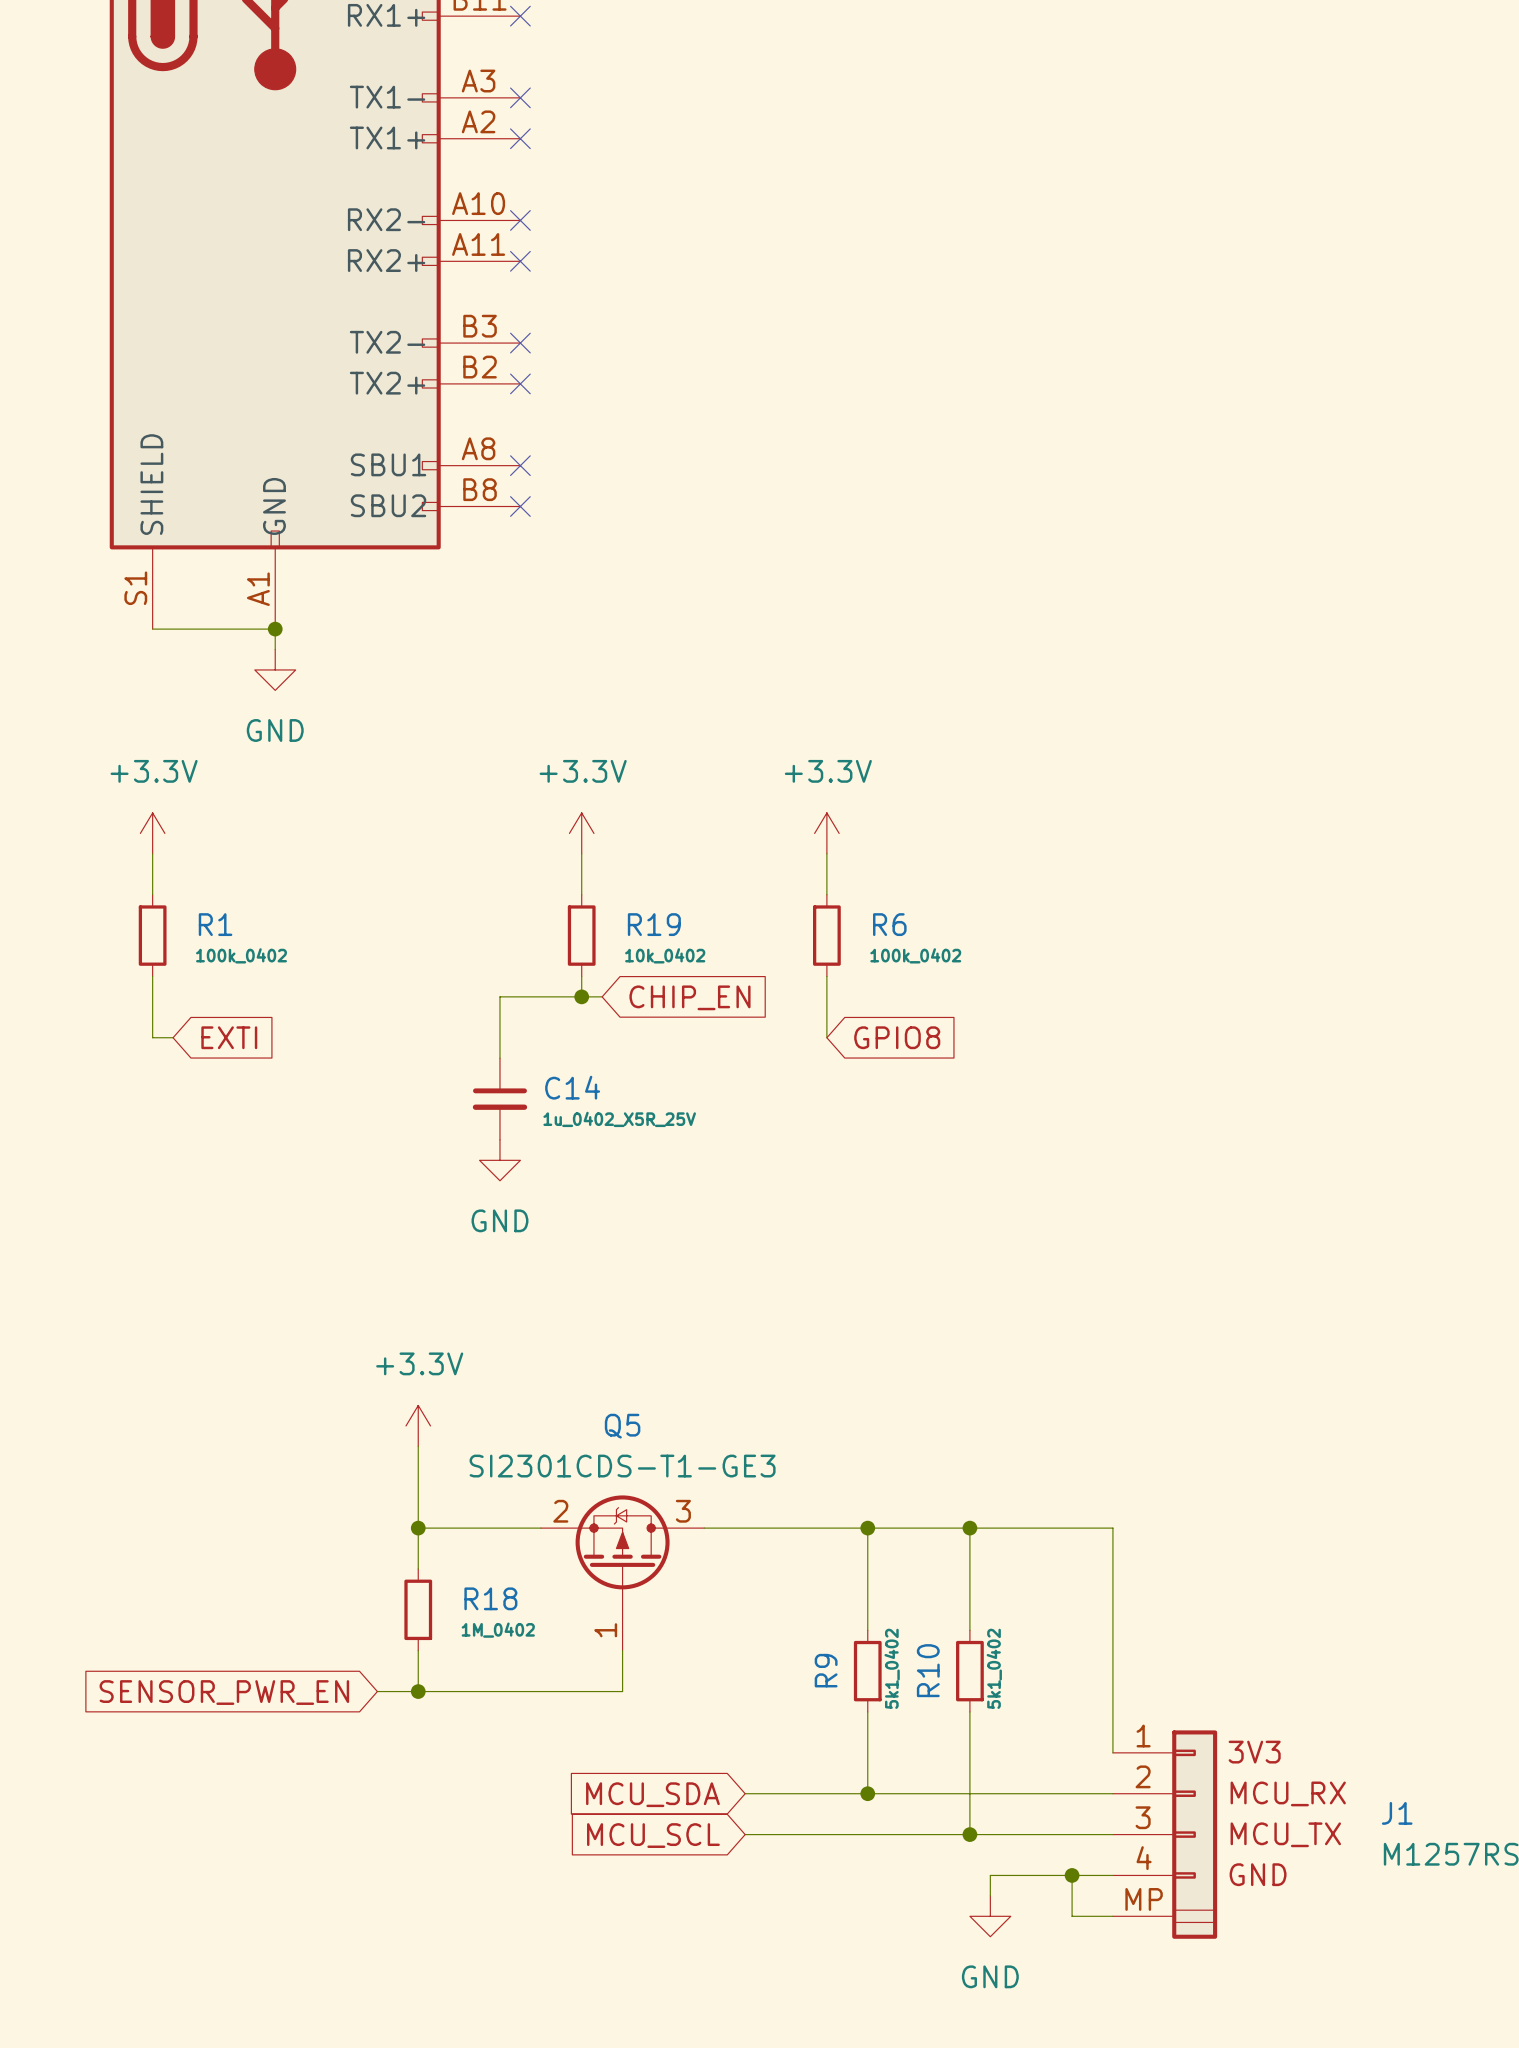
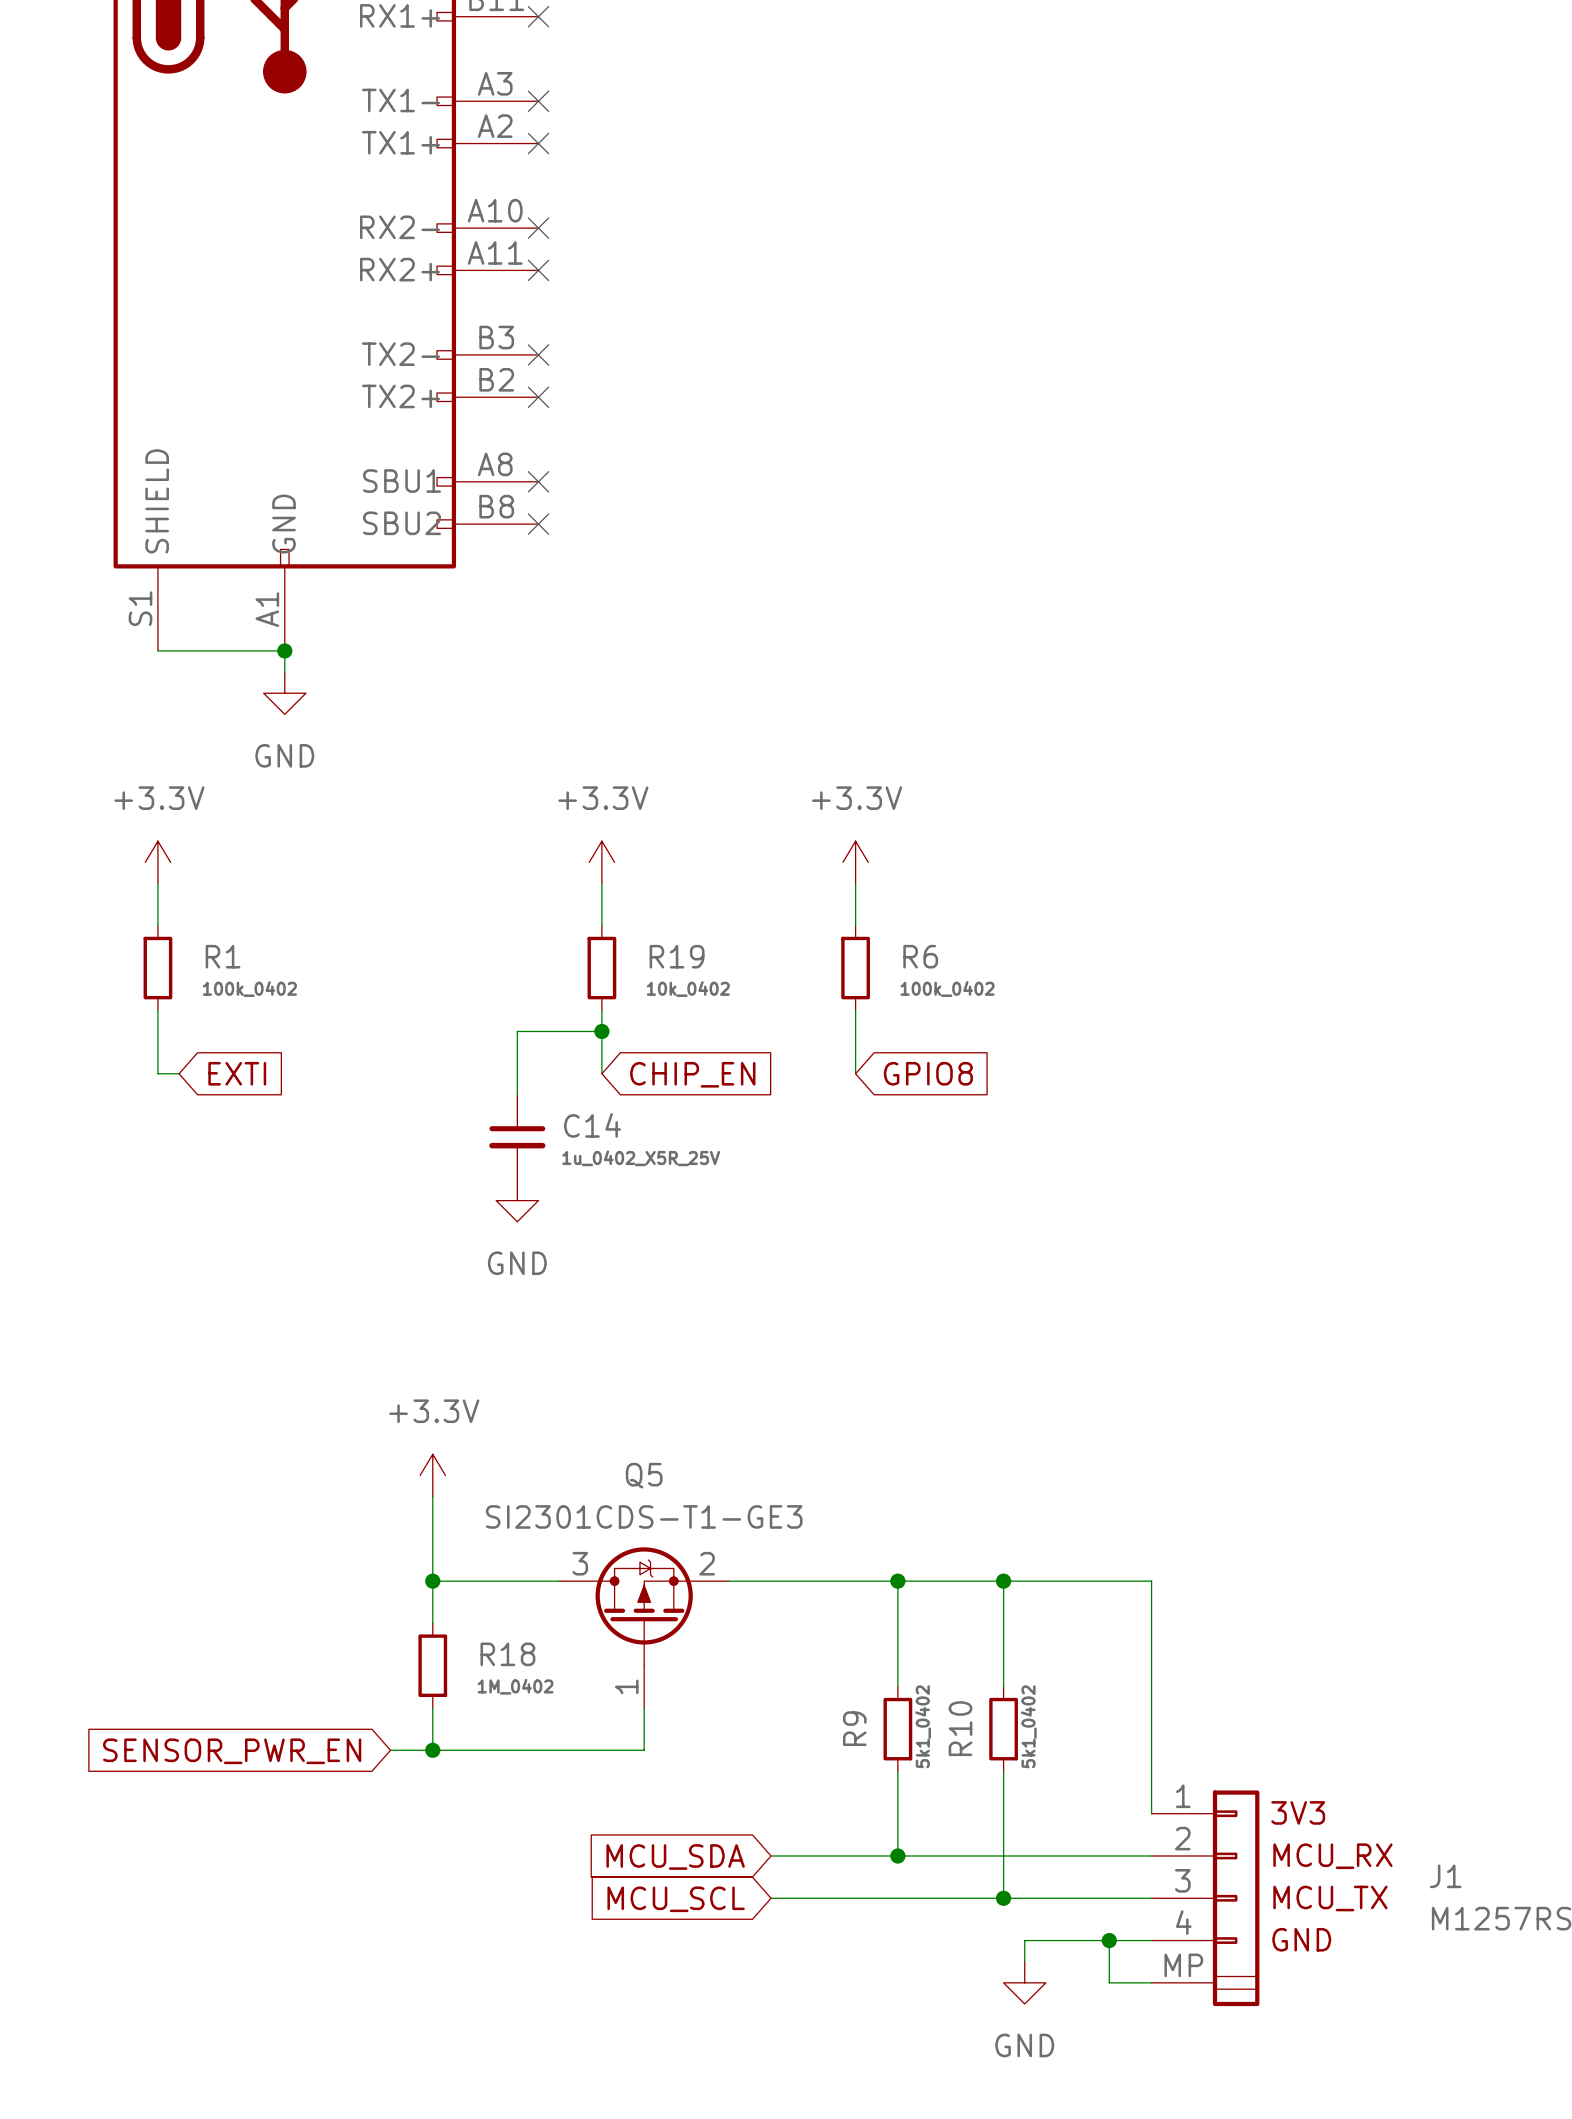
wire: (581, 996) (602, 996) -> (601, 1031) (601, 1073)
global label position: CHIP_EN (689, 997) -> CHIP_EN (692, 1074)
Q5 flip: as is (622, 1552) -> left-right (644, 1606)

